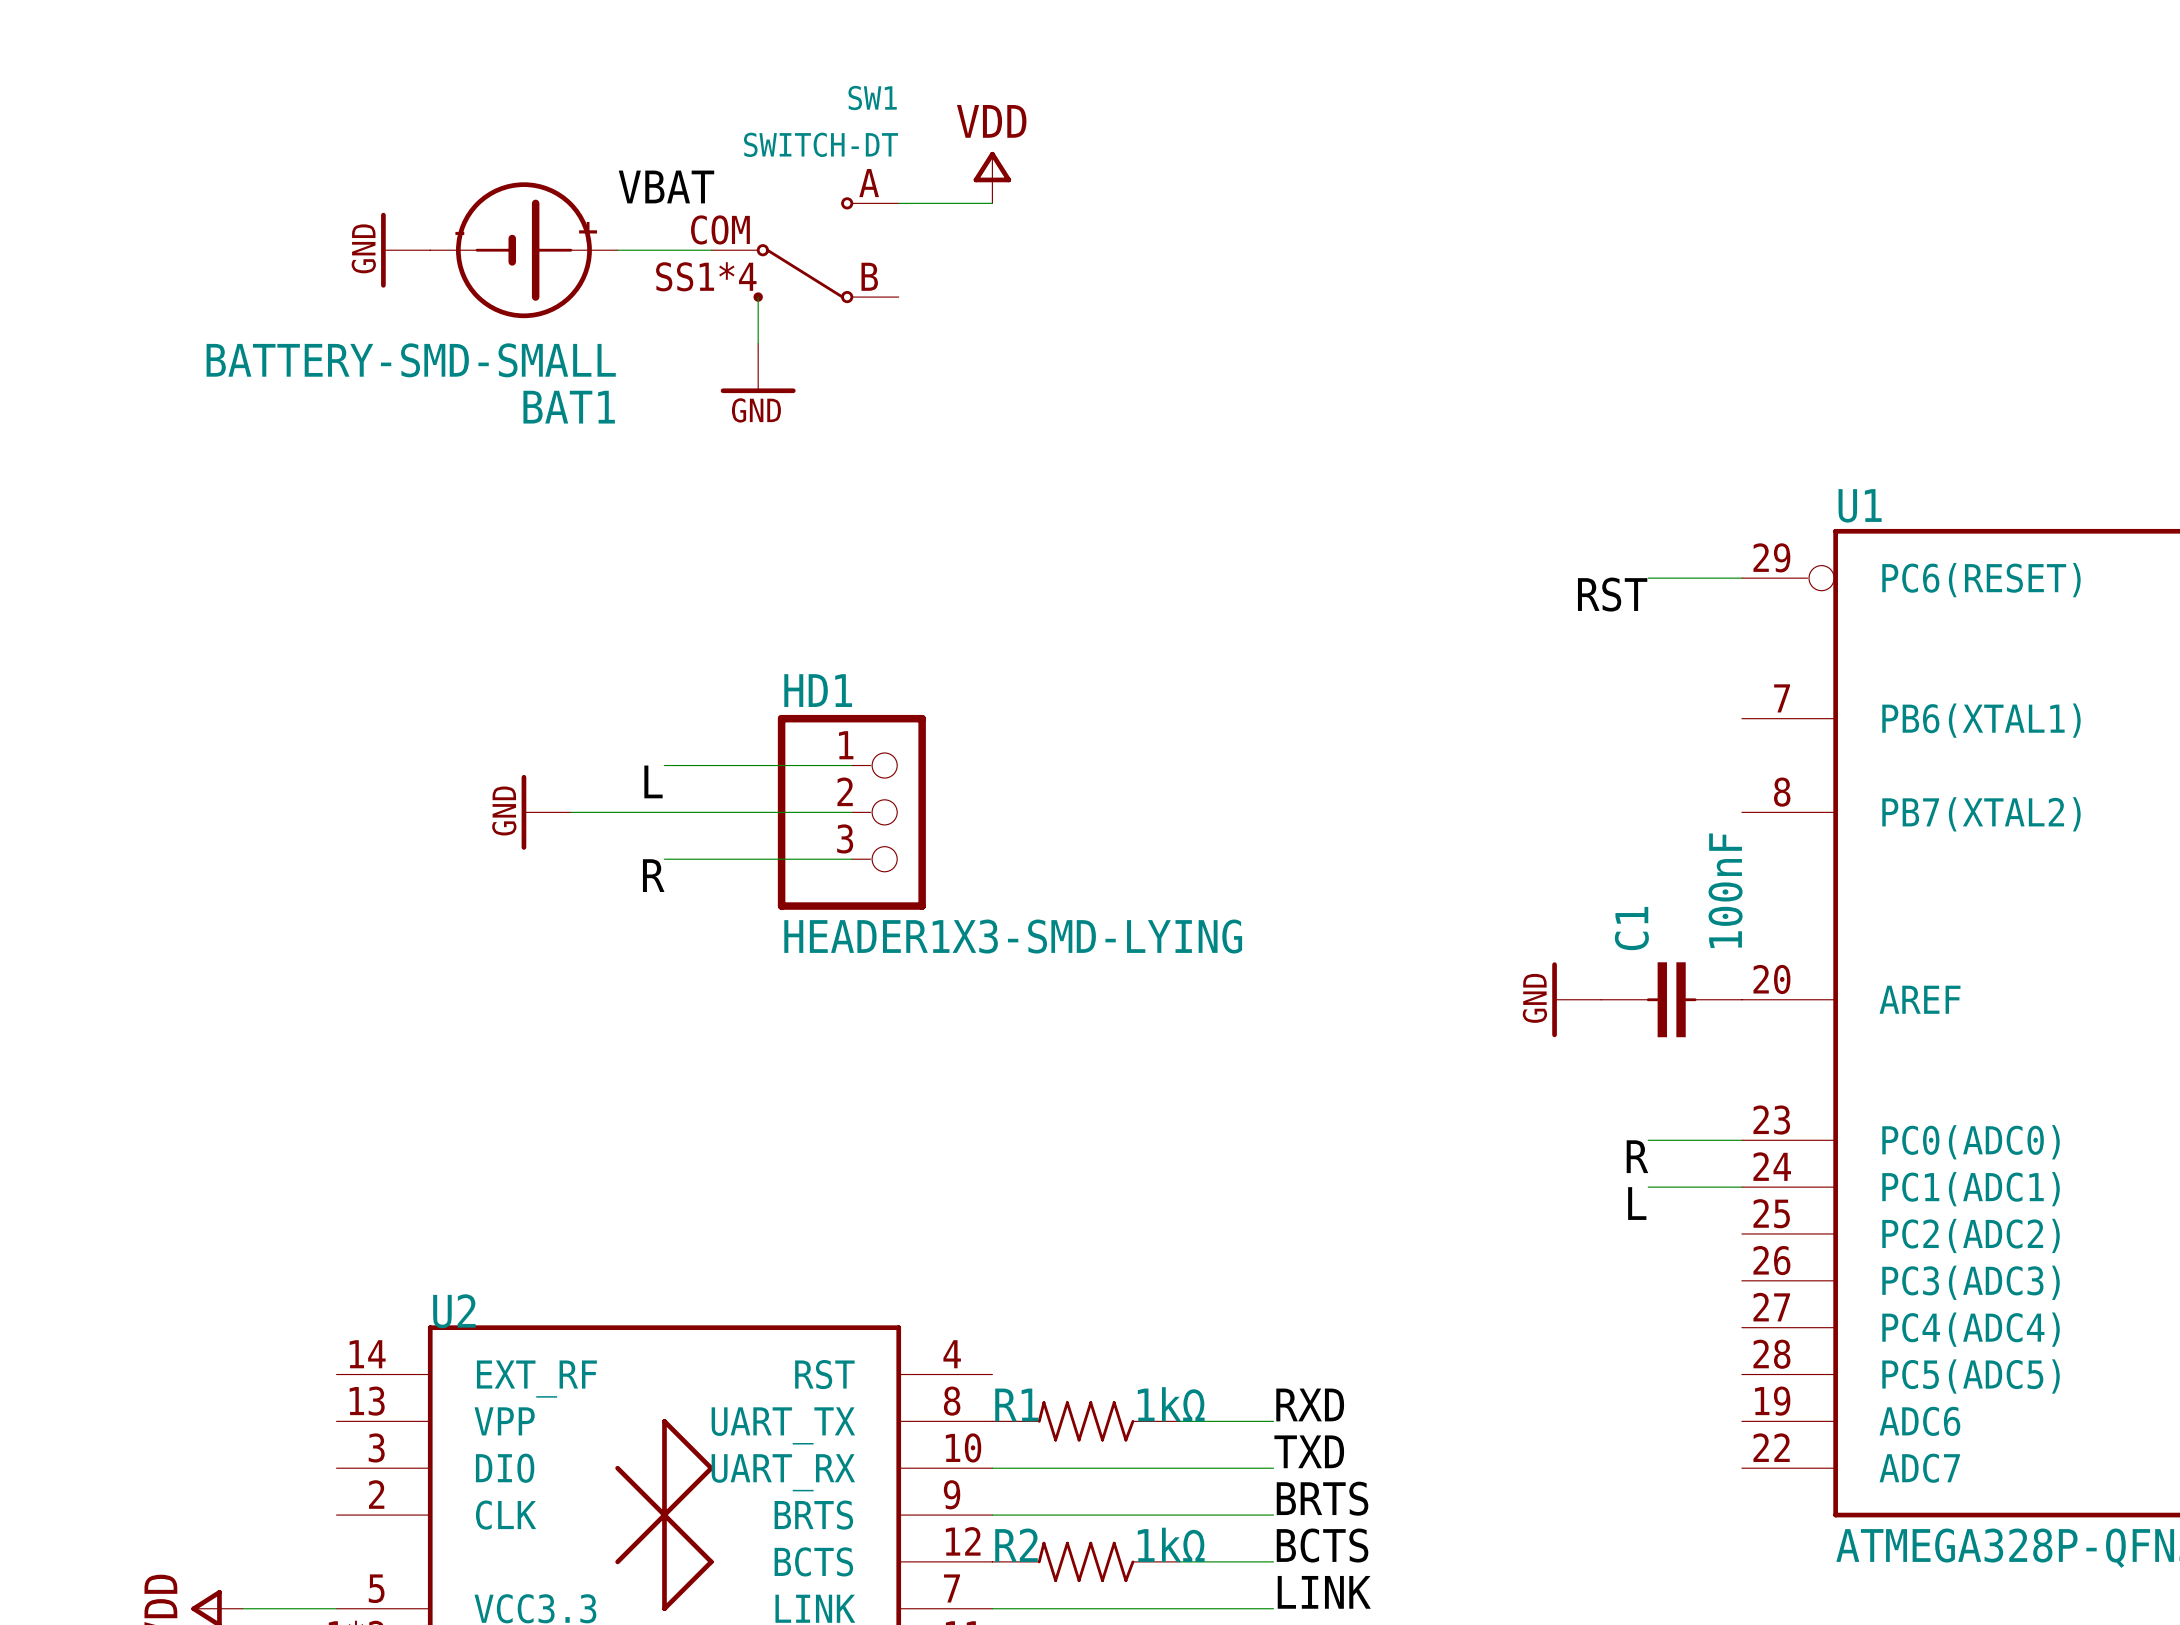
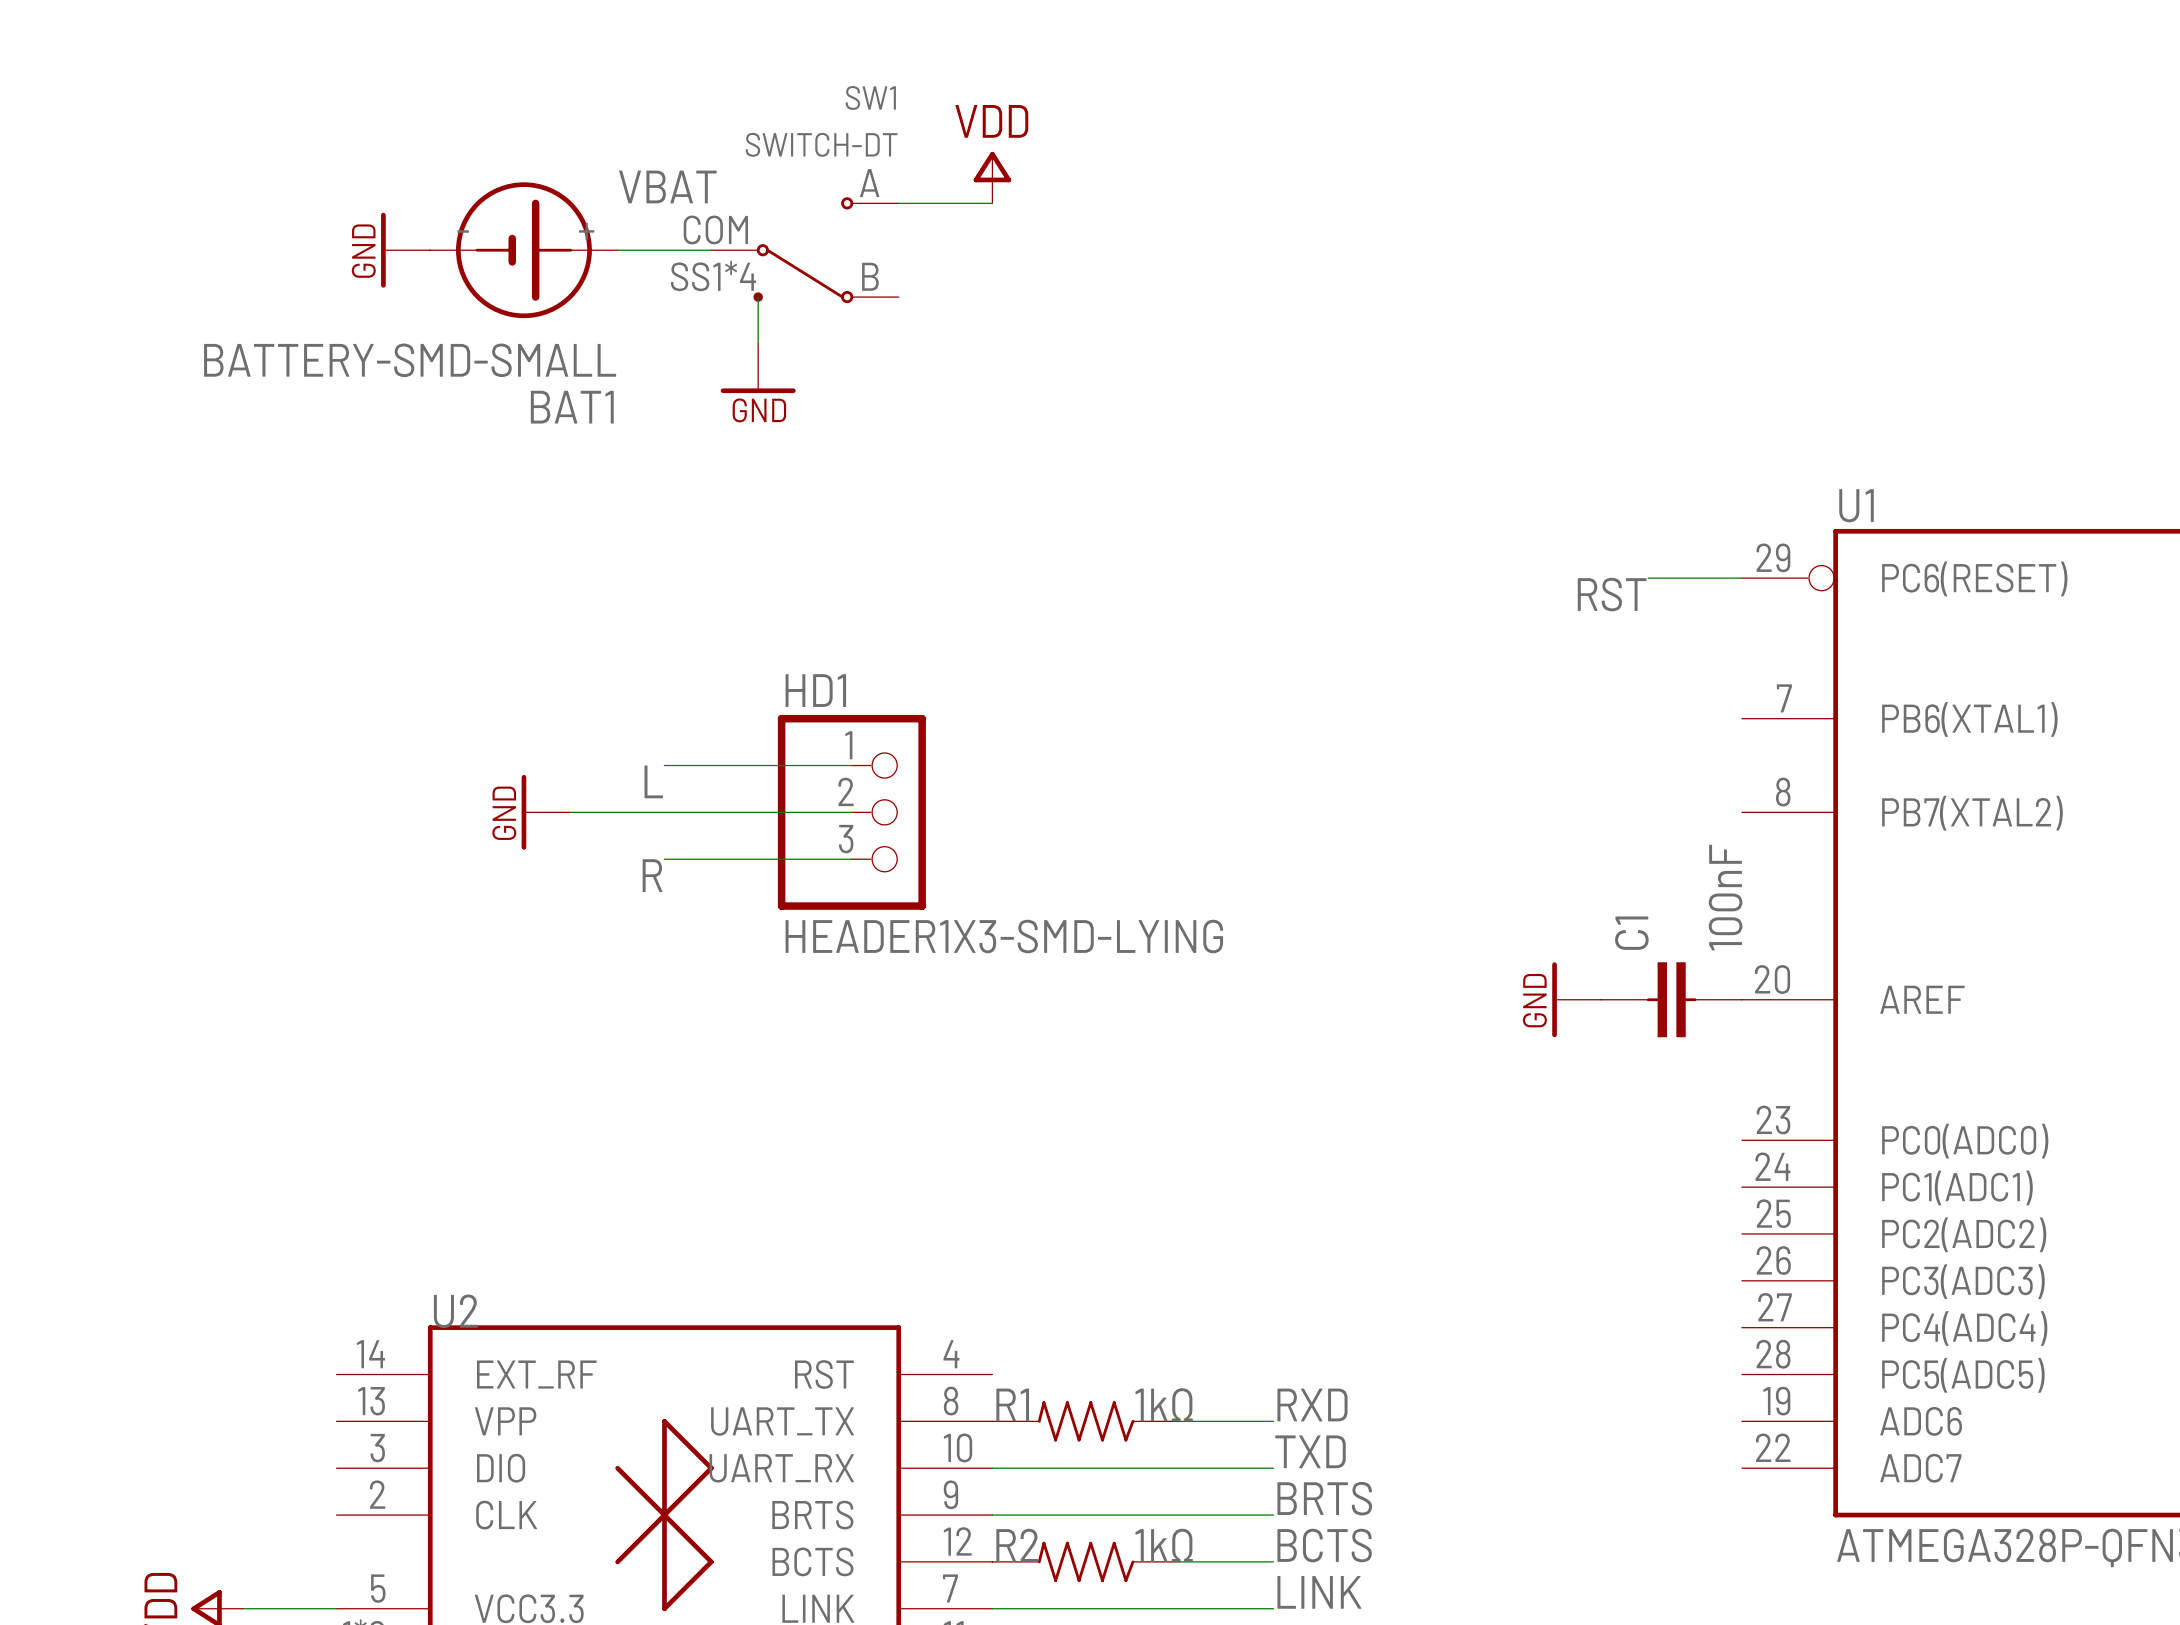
wire: (1648, 1140) (1741, 1140) -> none
label: R (1637, 1156) -> none
wire: (1648, 1187) (1741, 1187) -> none
label: L (1637, 1203) -> none

